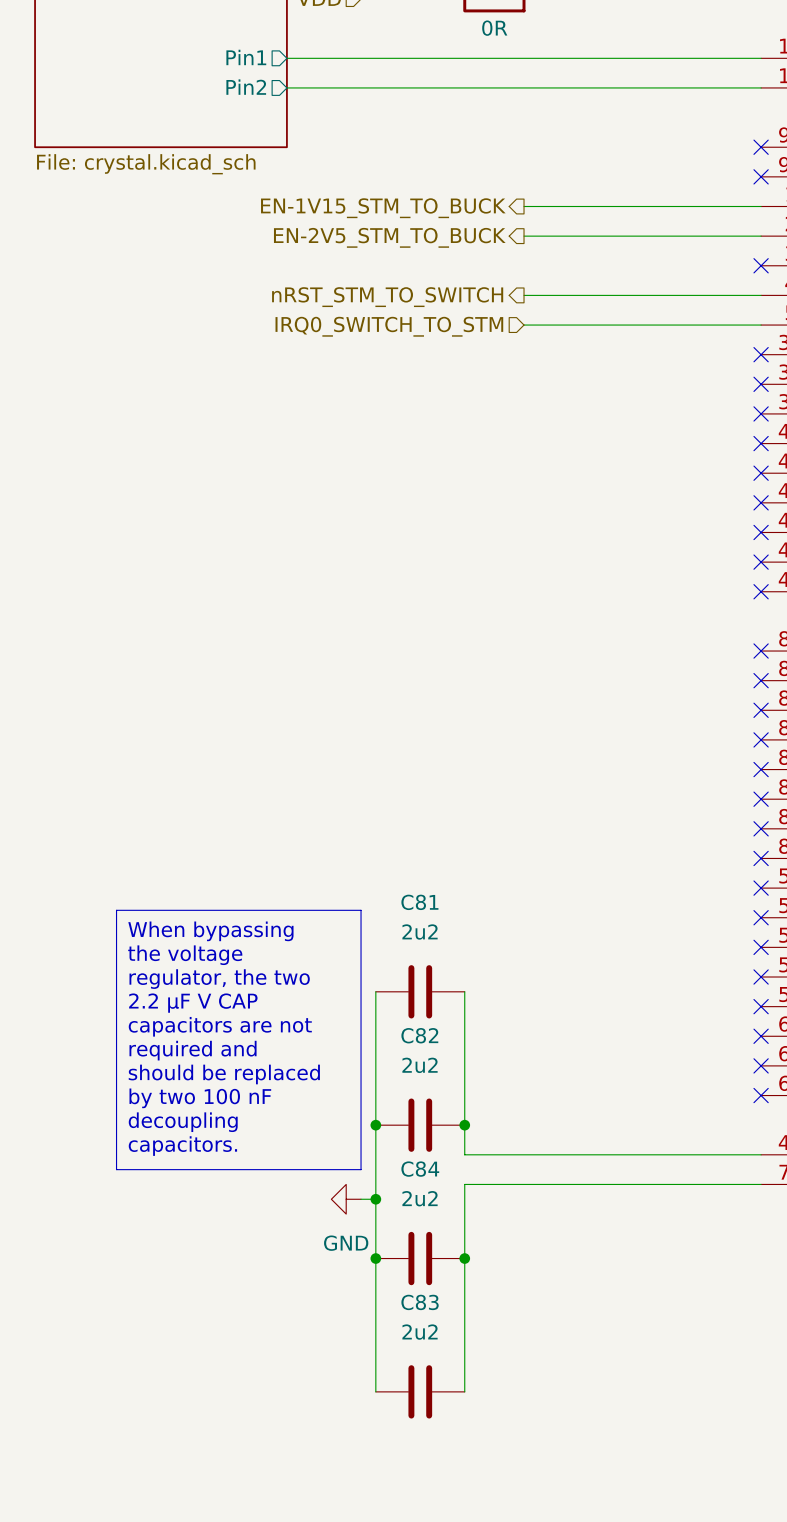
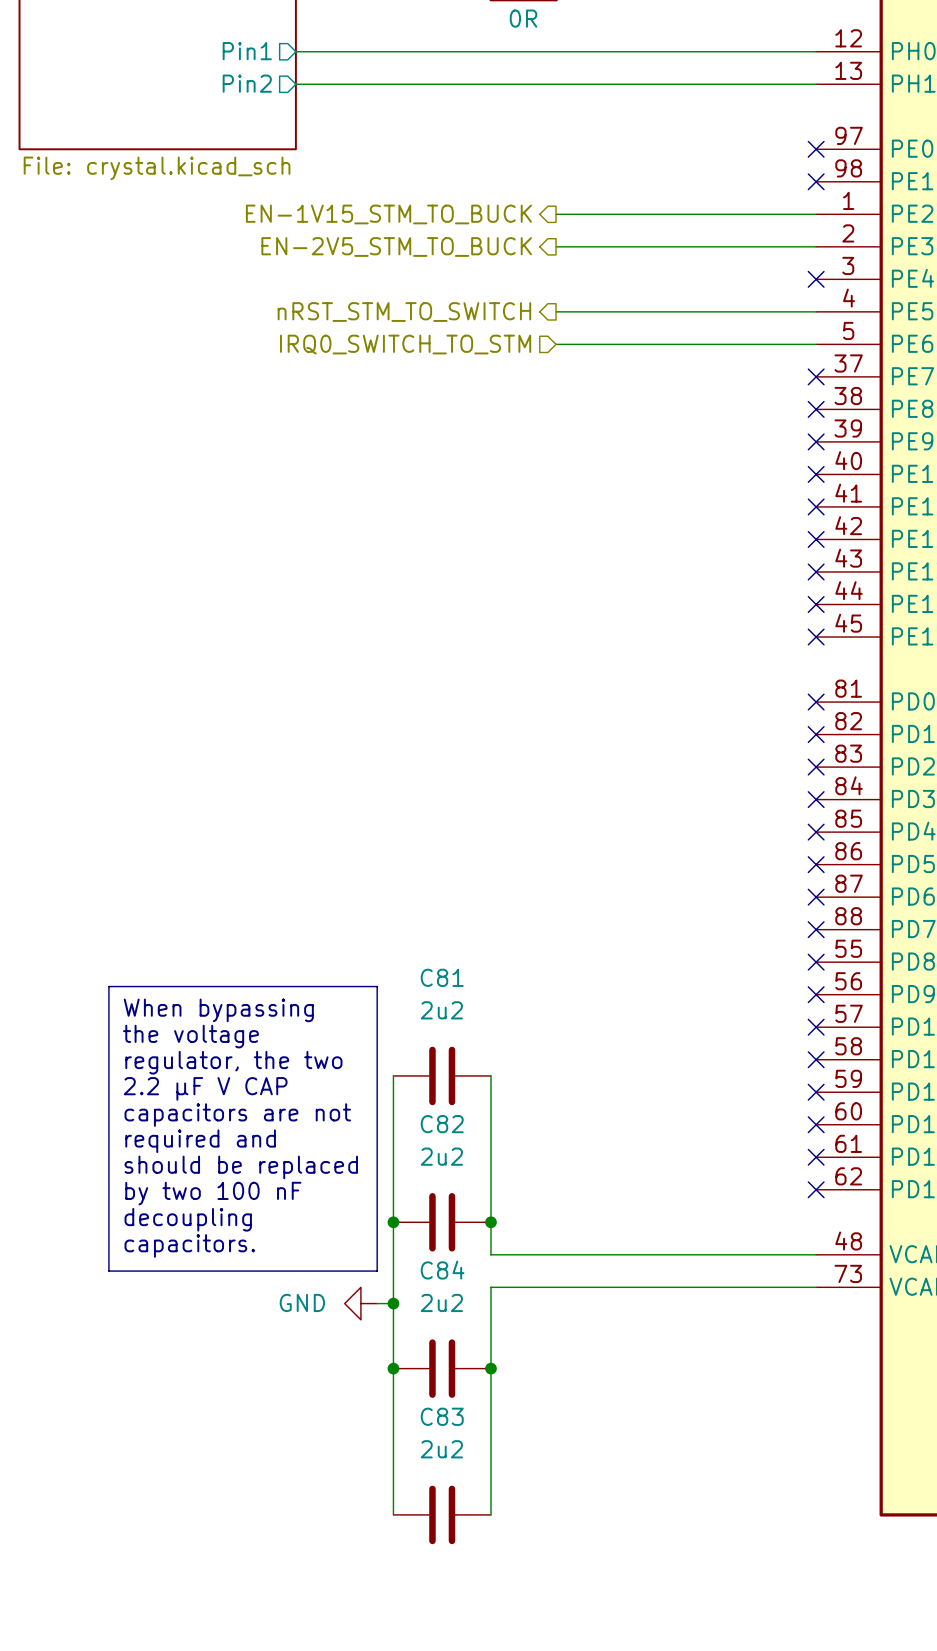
power symbol text position: GND (346, 1243) -> GND (302, 1302)

